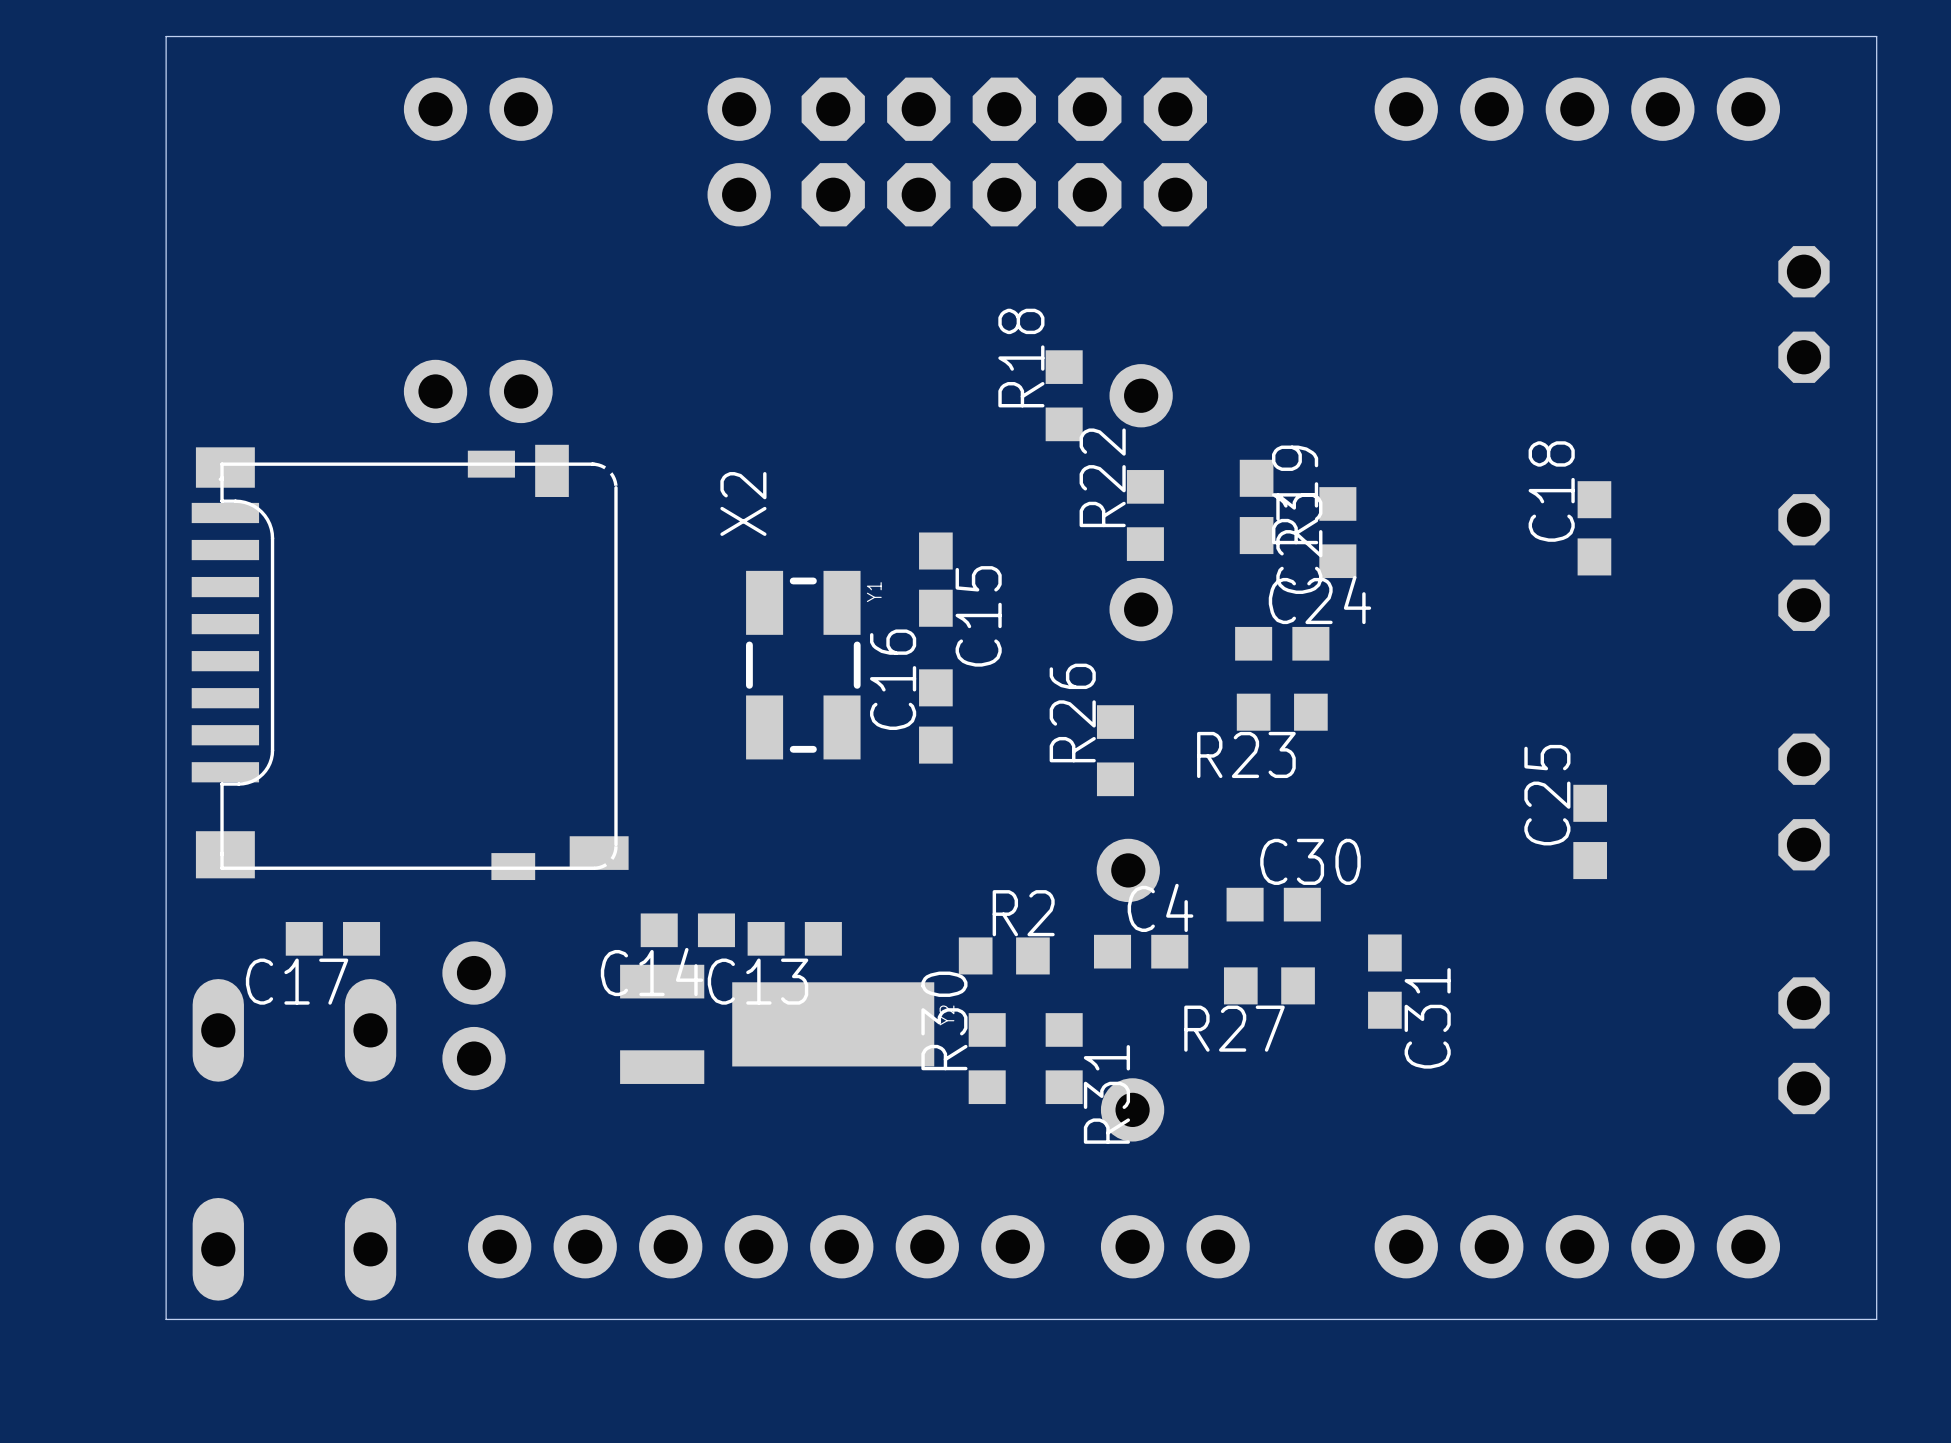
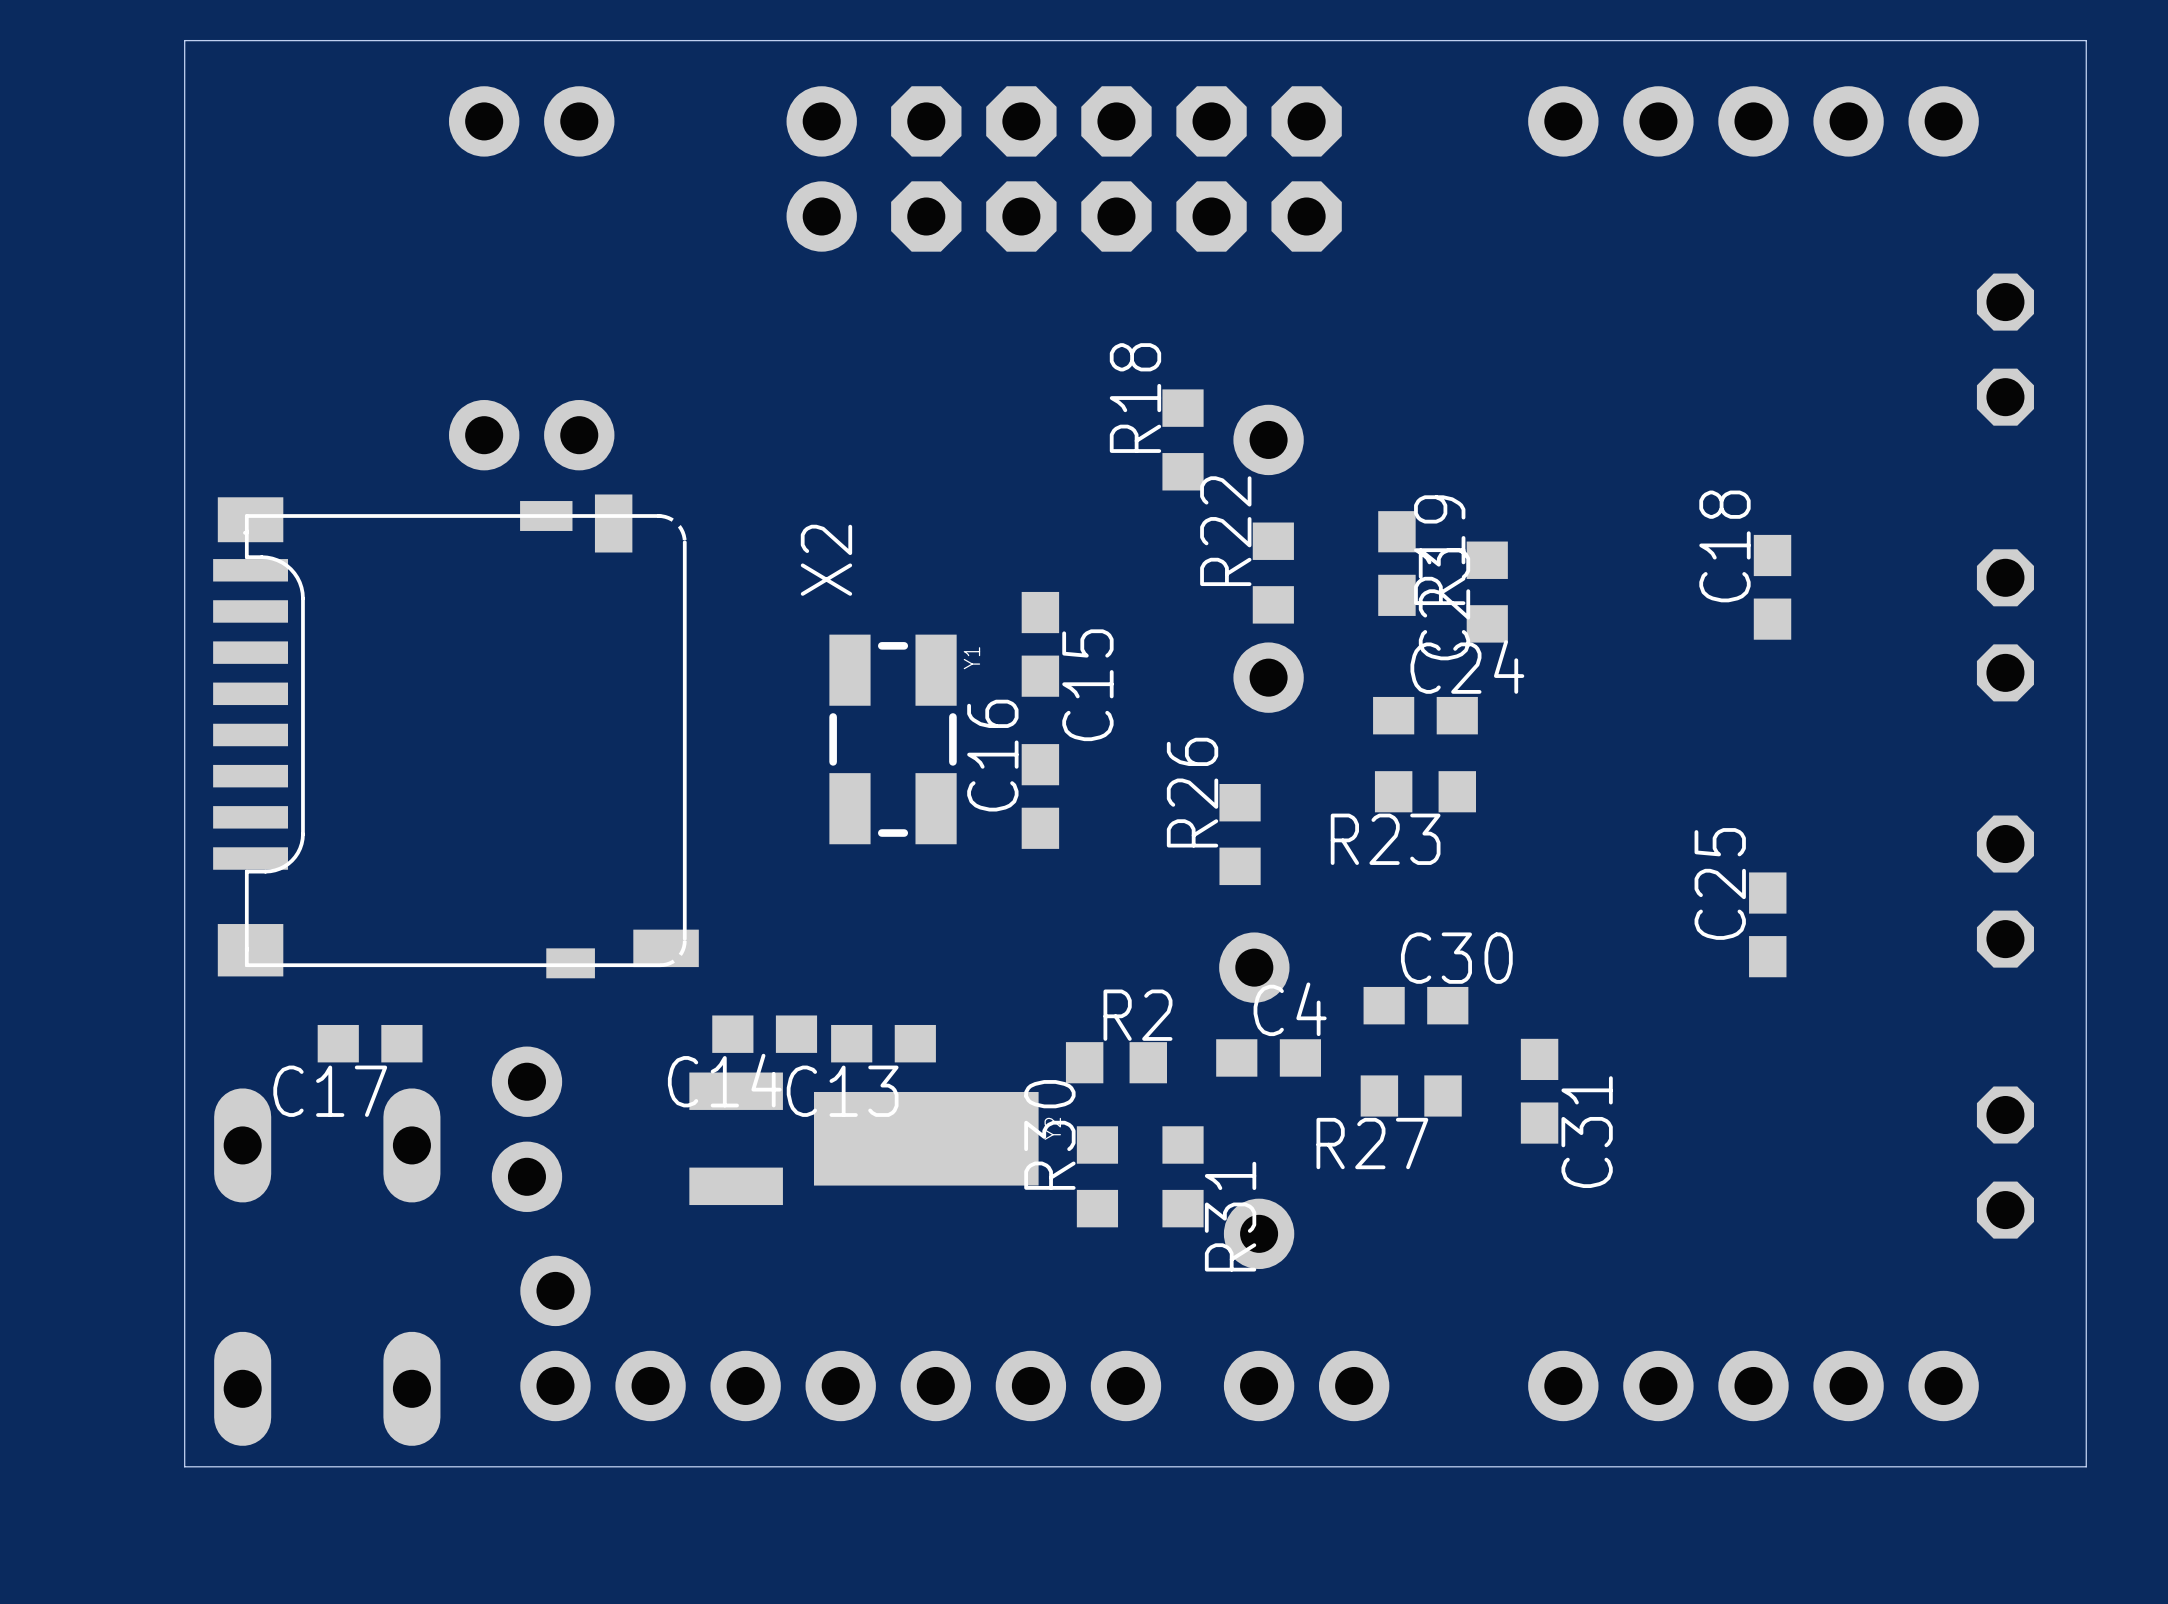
part: none -> (555, 1290)

